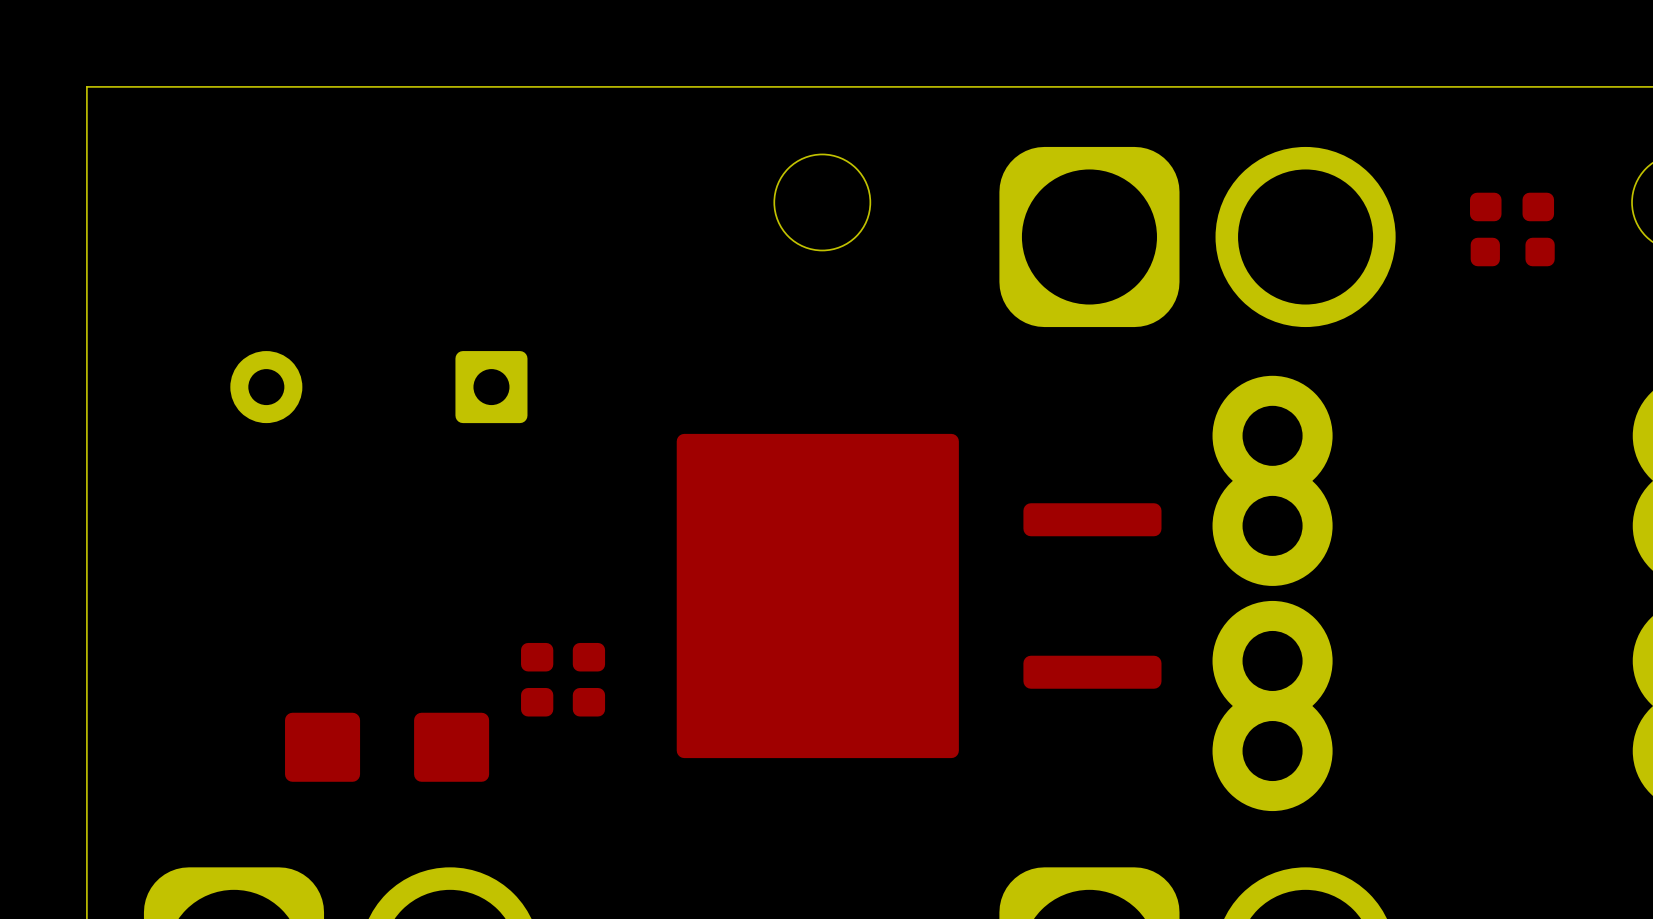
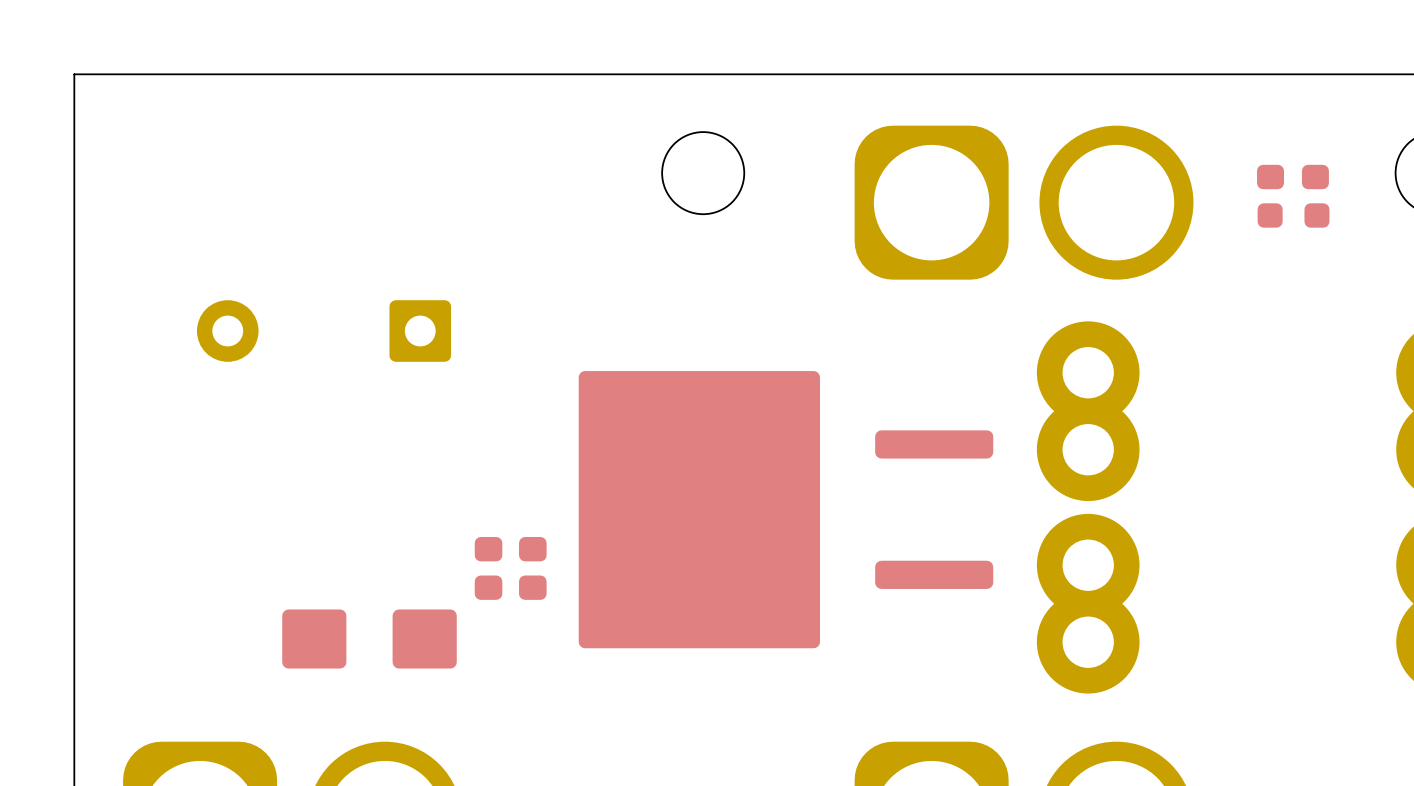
part: none -> (510, 549)
part: (563, 657) -> none
part: none -> (510, 587)
part: (563, 702) -> none
part position: (387, 747) -> (369, 639)

